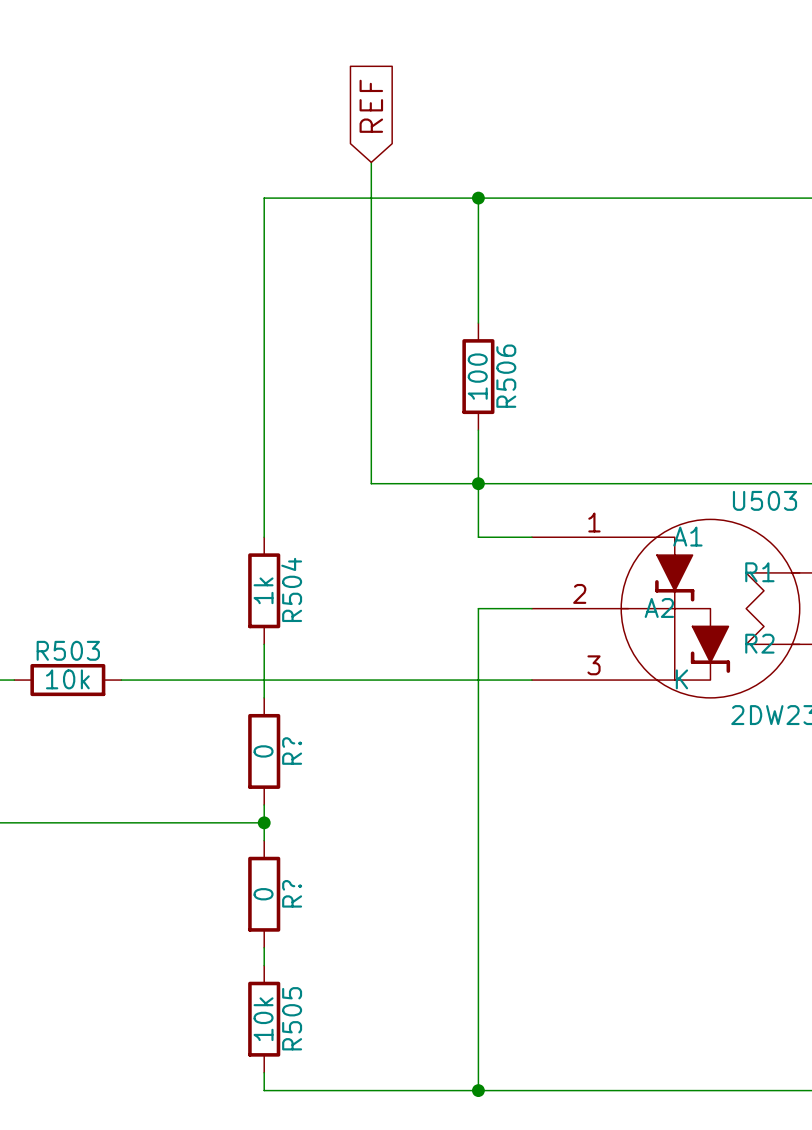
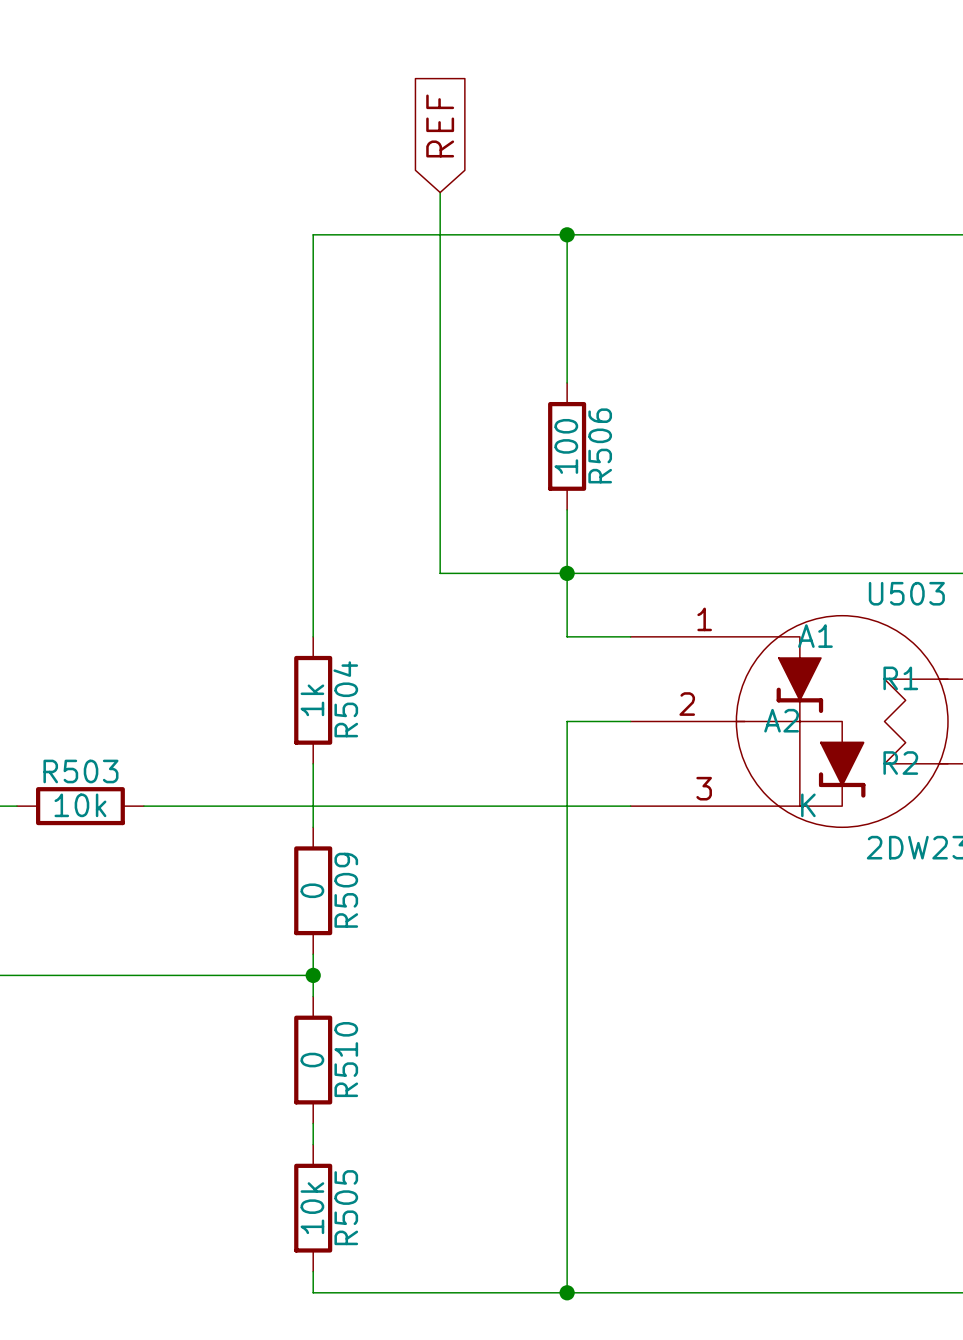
R? name: R? (292, 751) -> R509 (346, 890)
R? name: R? (292, 893) -> R510 (346, 1059)

